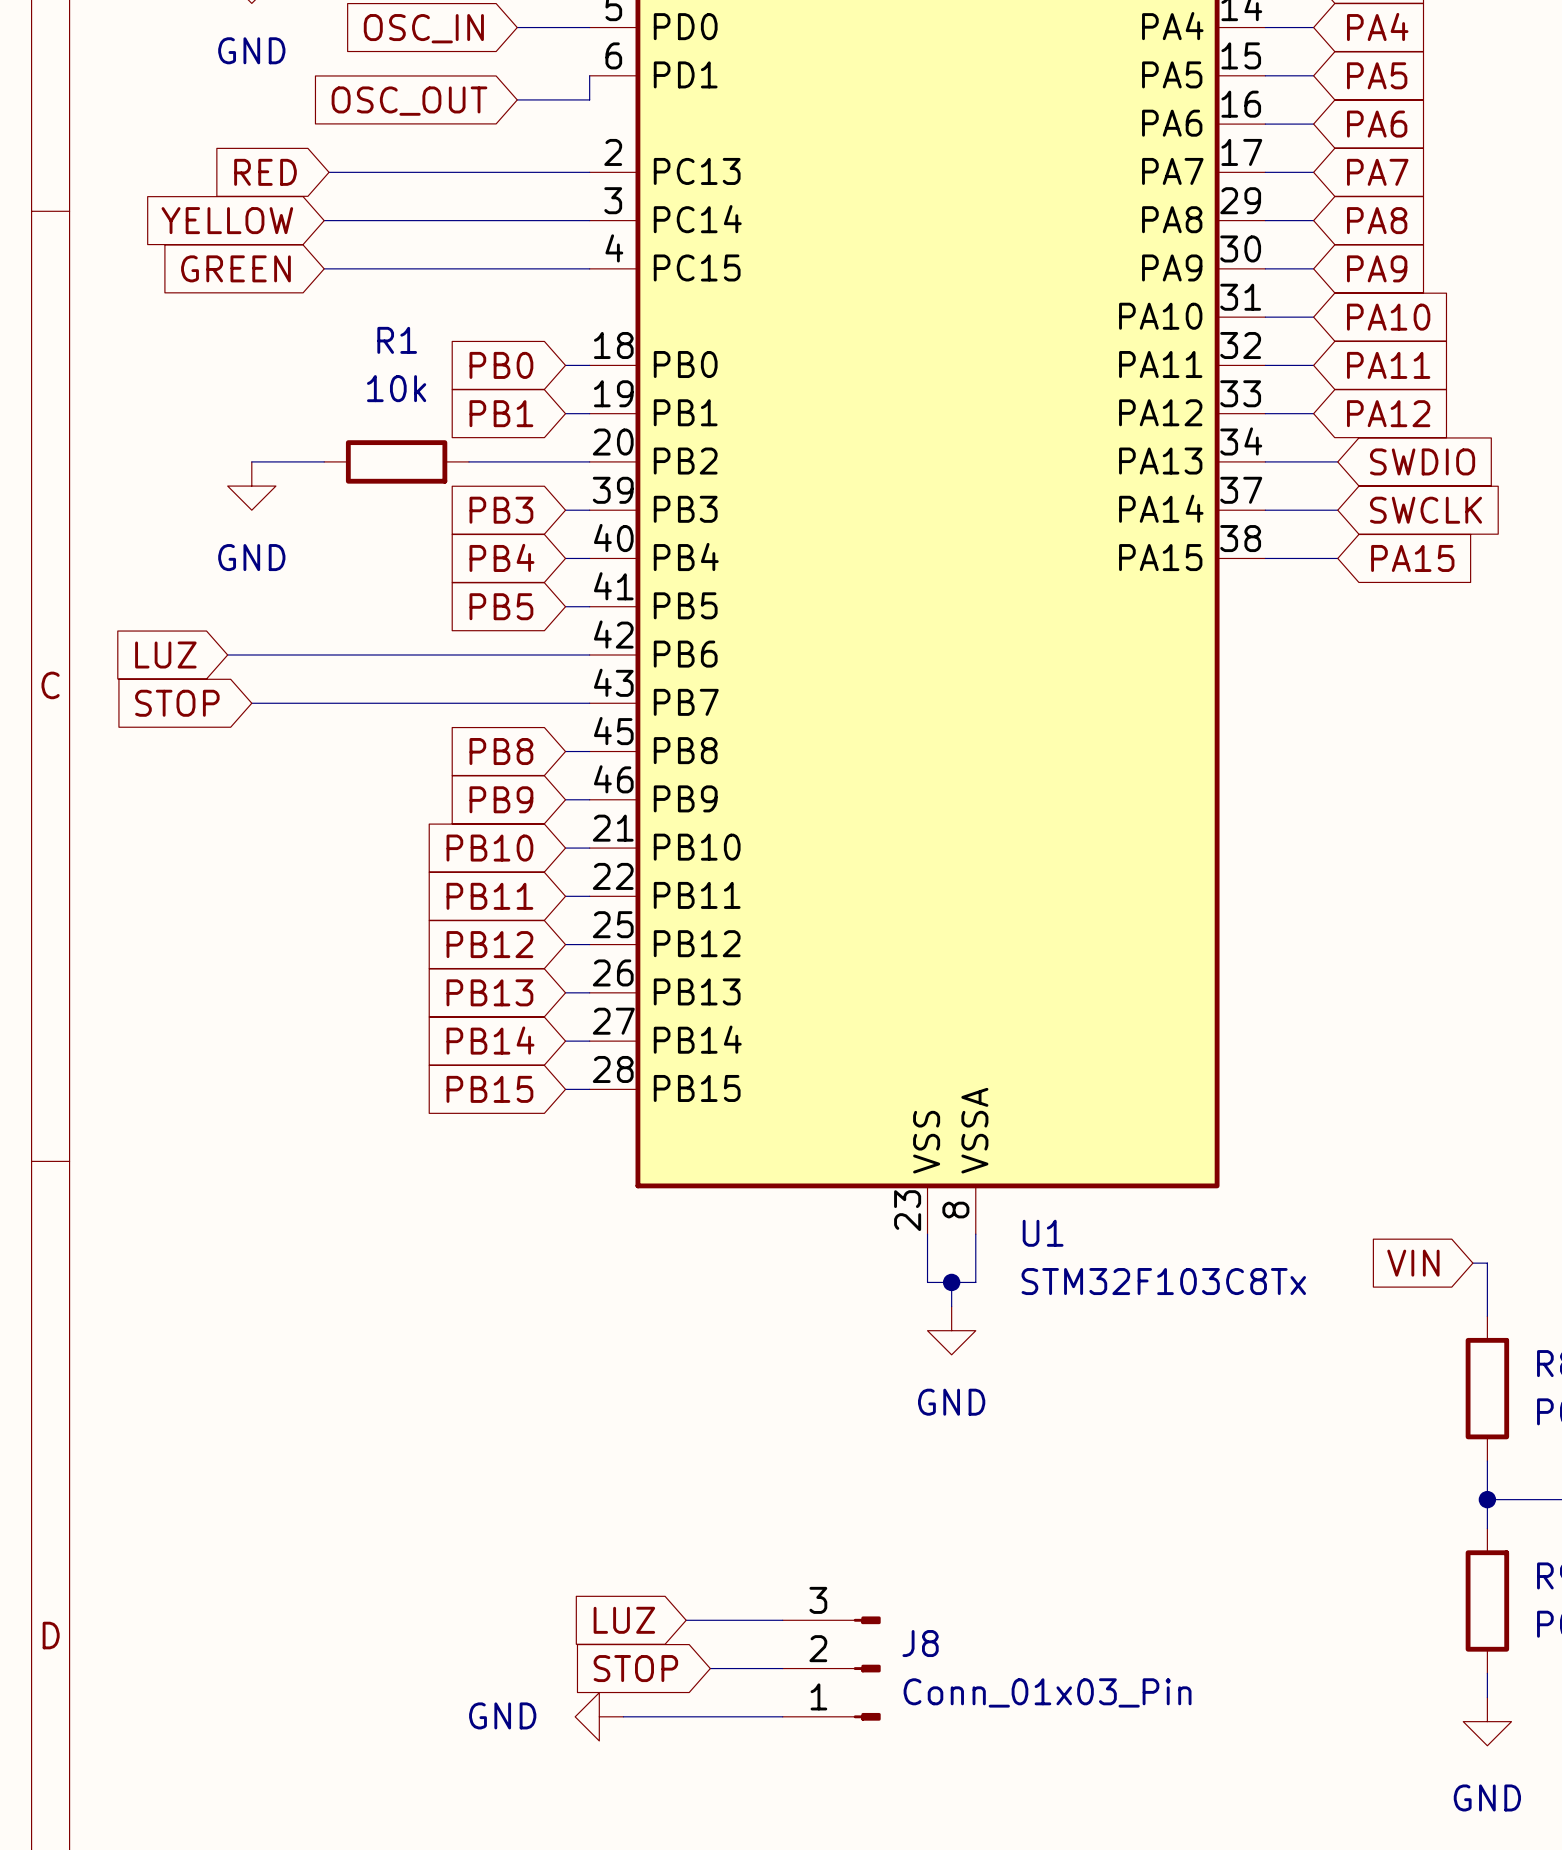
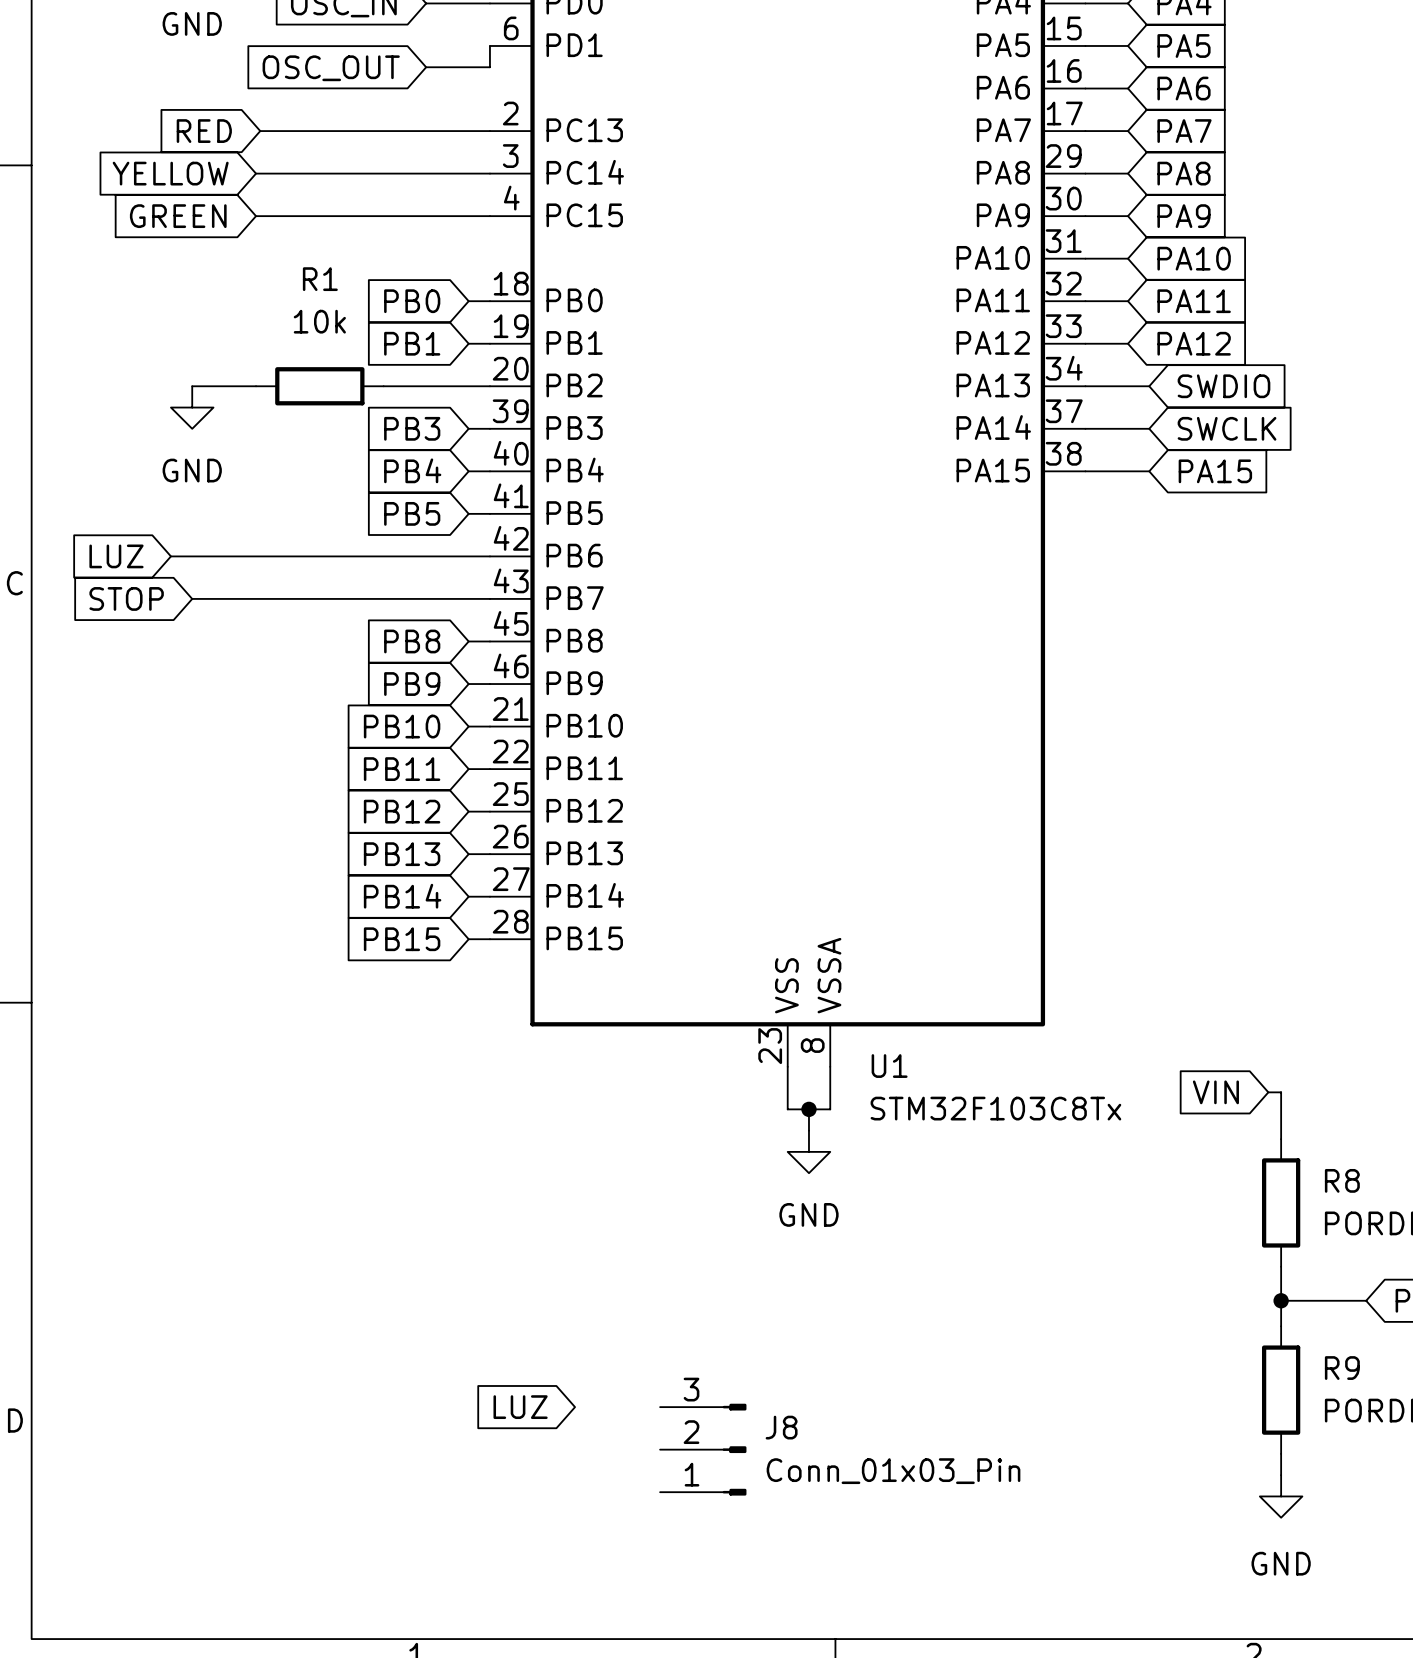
wire: (686, 1620) (782, 1620) -> none
global label: STOP (635, 1668) -> none
wire: (710, 1668) (782, 1668) -> none
power symbol: GND (599, 1716) -> none
wire: (623, 1716) (782, 1716) -> none

